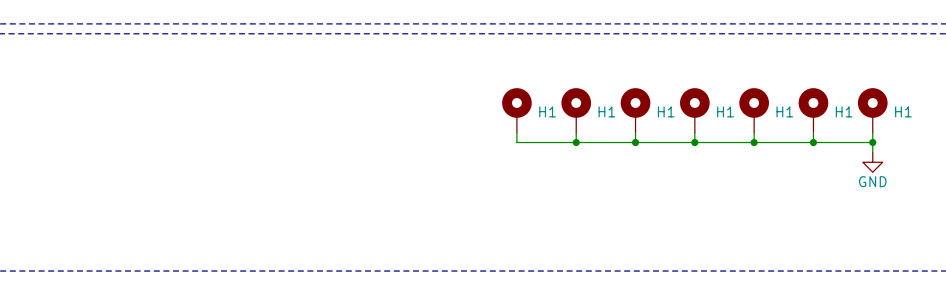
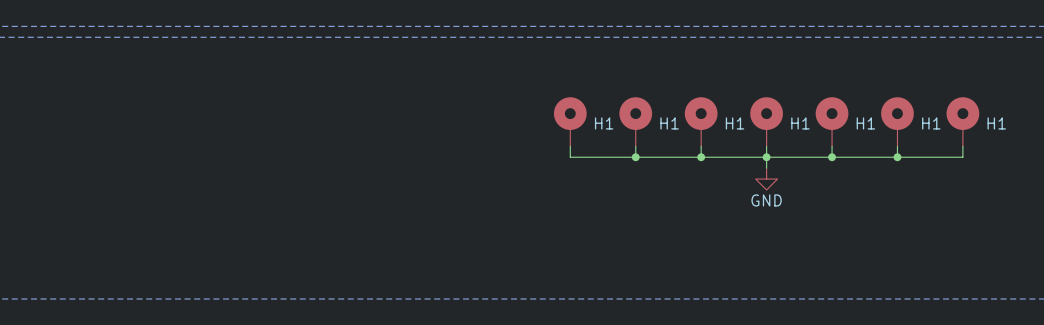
wire: (872, 142) (872, 152) -> (766, 157) (766, 168)
junction: (872, 142) -> none
power symbol position: GND (872, 162) -> GND (766, 179)

